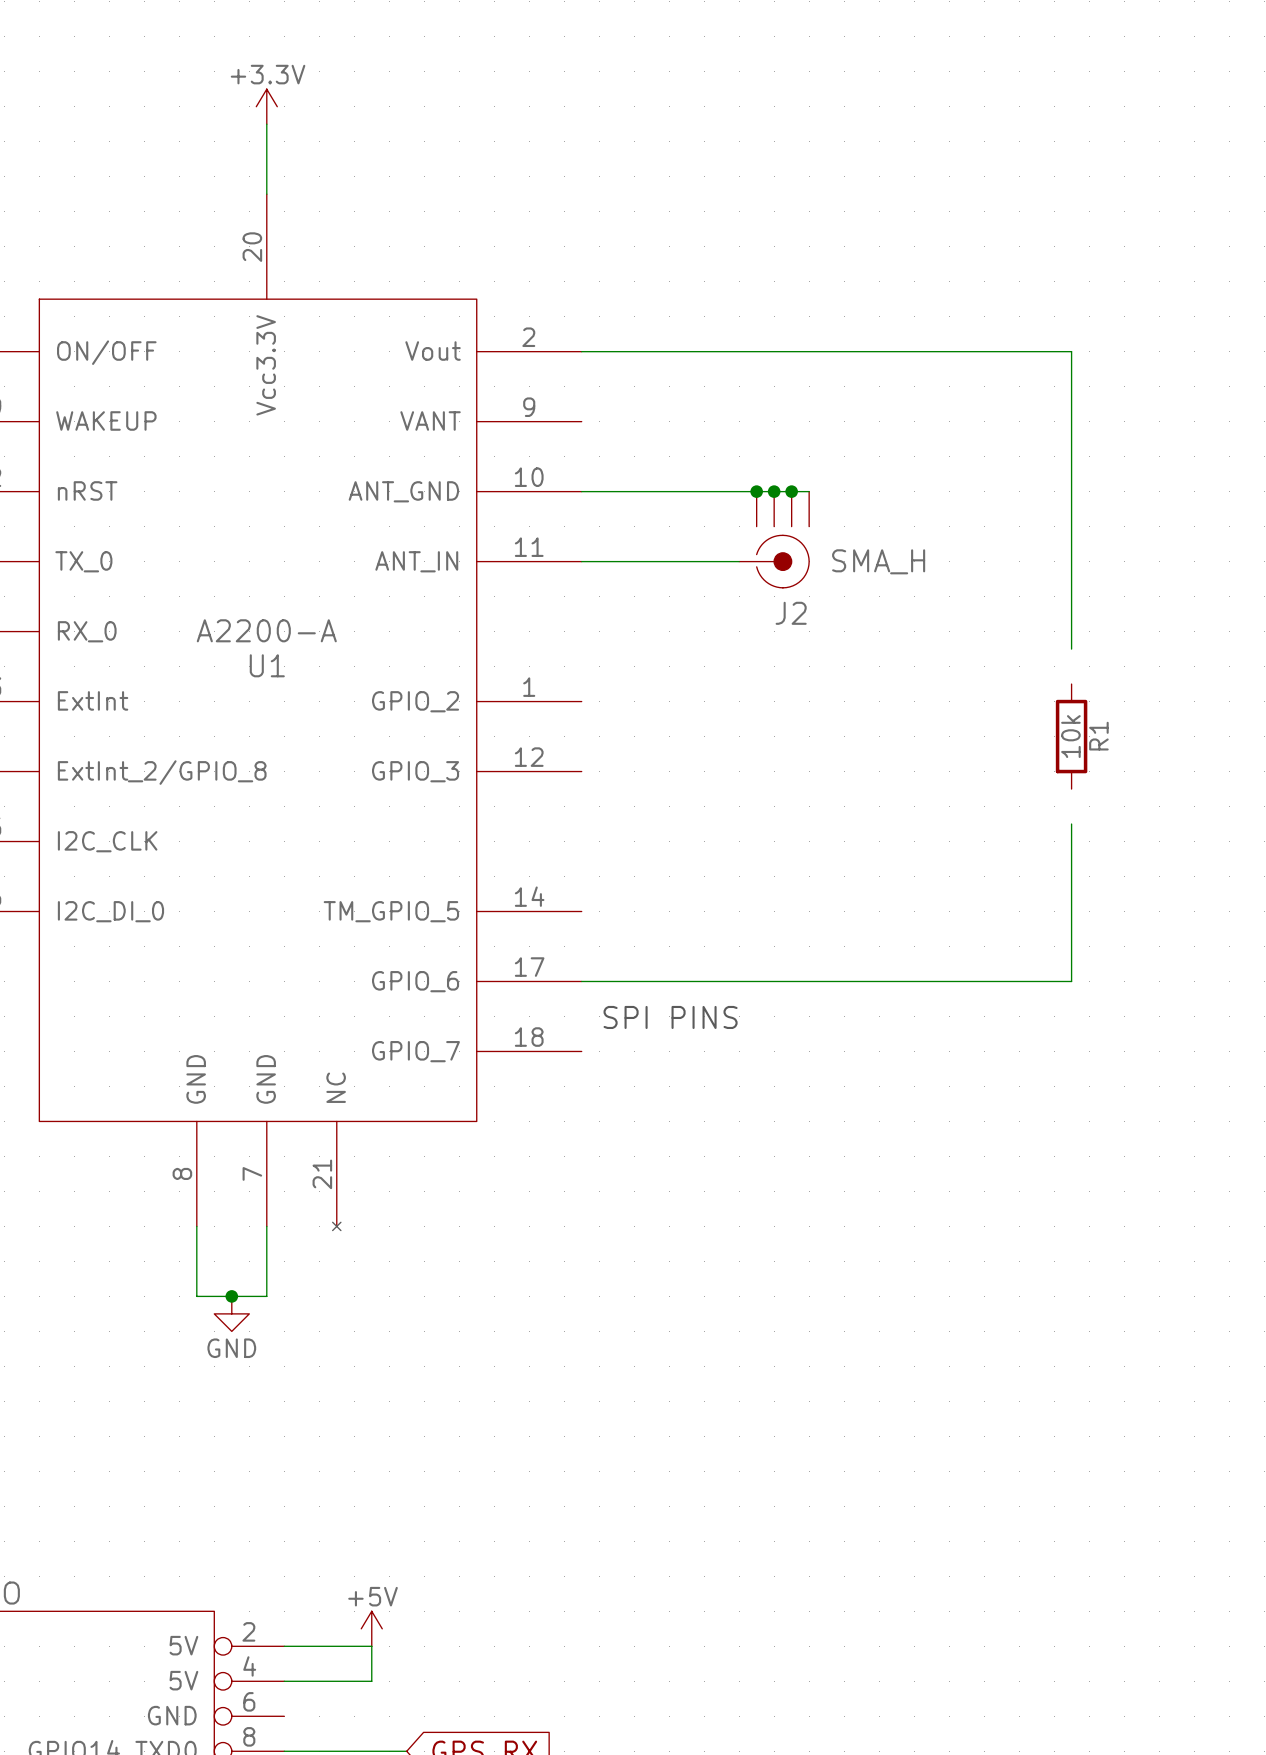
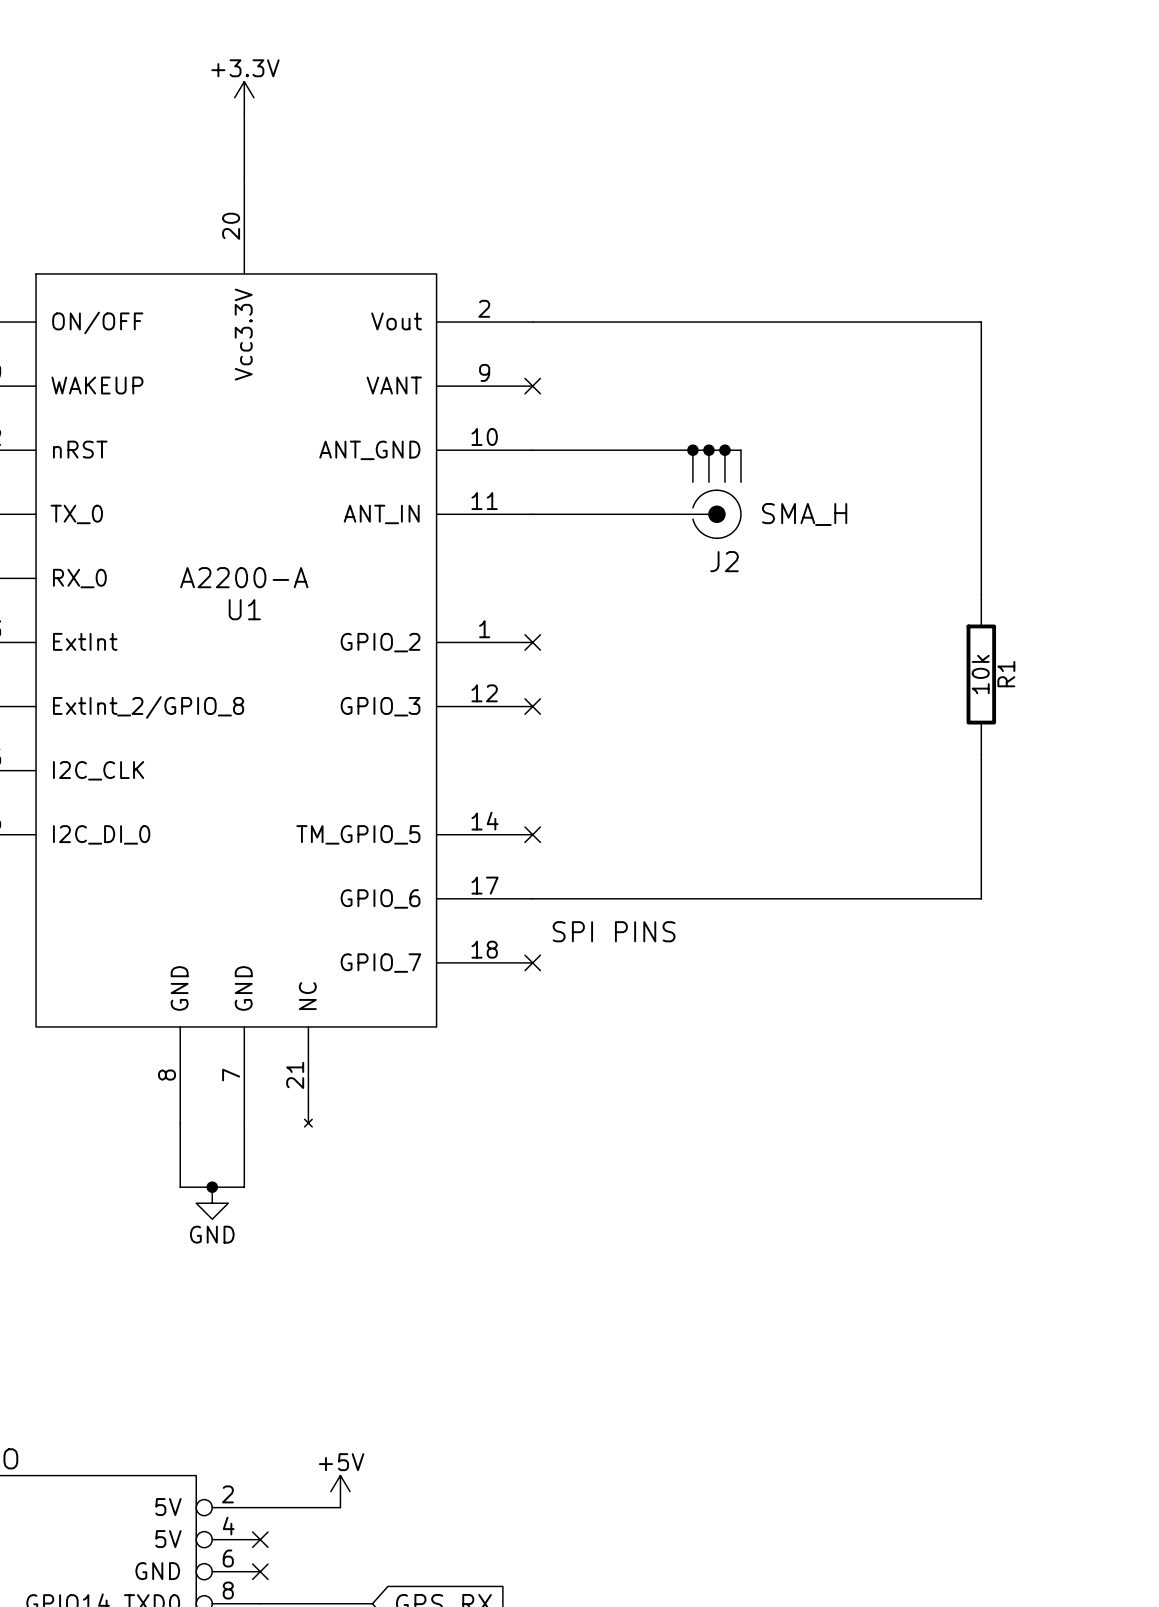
no-connect mark: none -> (532, 386)
R1 symbol: [1055, 684, 1088, 790] -> [966, 594, 997, 755]
no-connect mark: none -> (532, 642)
no-connect mark: none -> (532, 706)
no-connect mark: none -> (532, 834)
no-connect mark: none -> (532, 962)
wire: (371, 1646) (371, 1681) (284, 1681) -> none
no-connect mark: none -> (260, 1539)
no-connect mark: none -> (260, 1571)

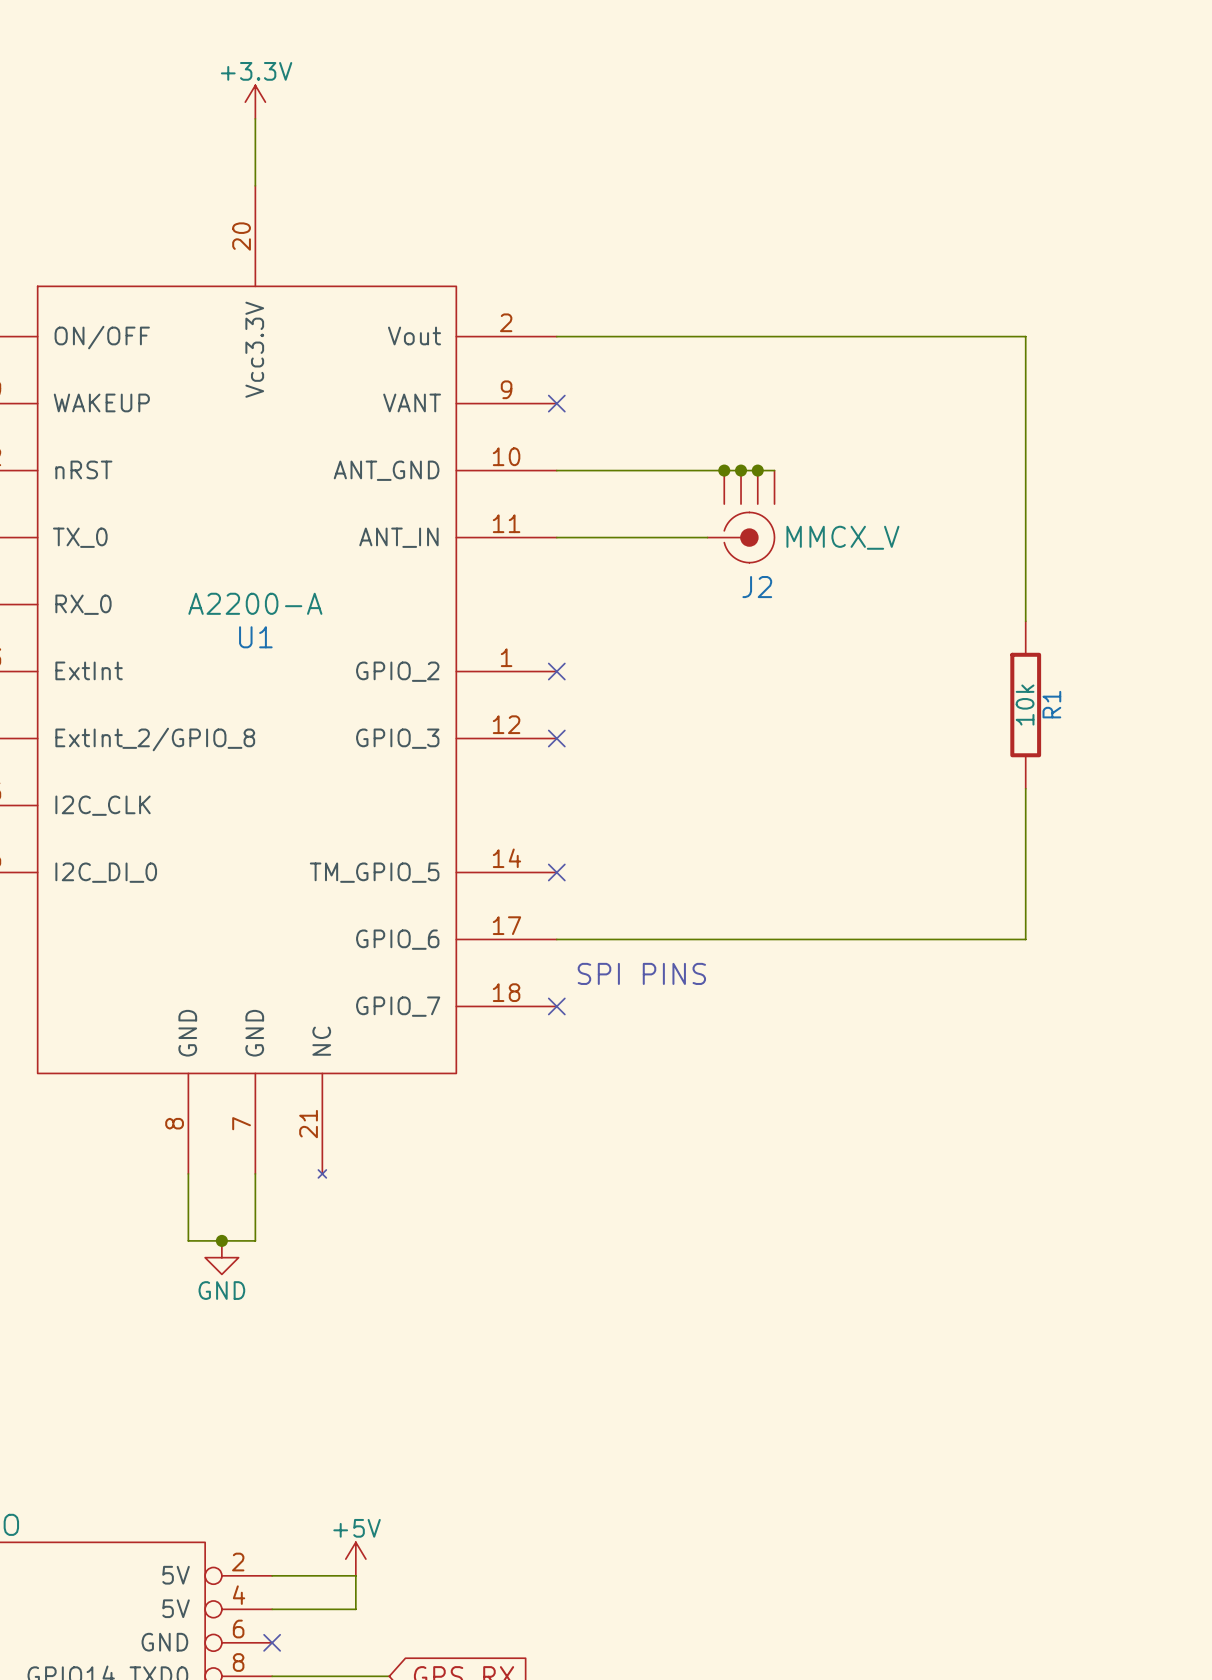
J2 text: SMA_H (804, 514) -> MMCX_V (842, 537)
wire: none -> (355, 1575) (355, 1609) (272, 1609)
no-connect mark: (260, 1539) -> none

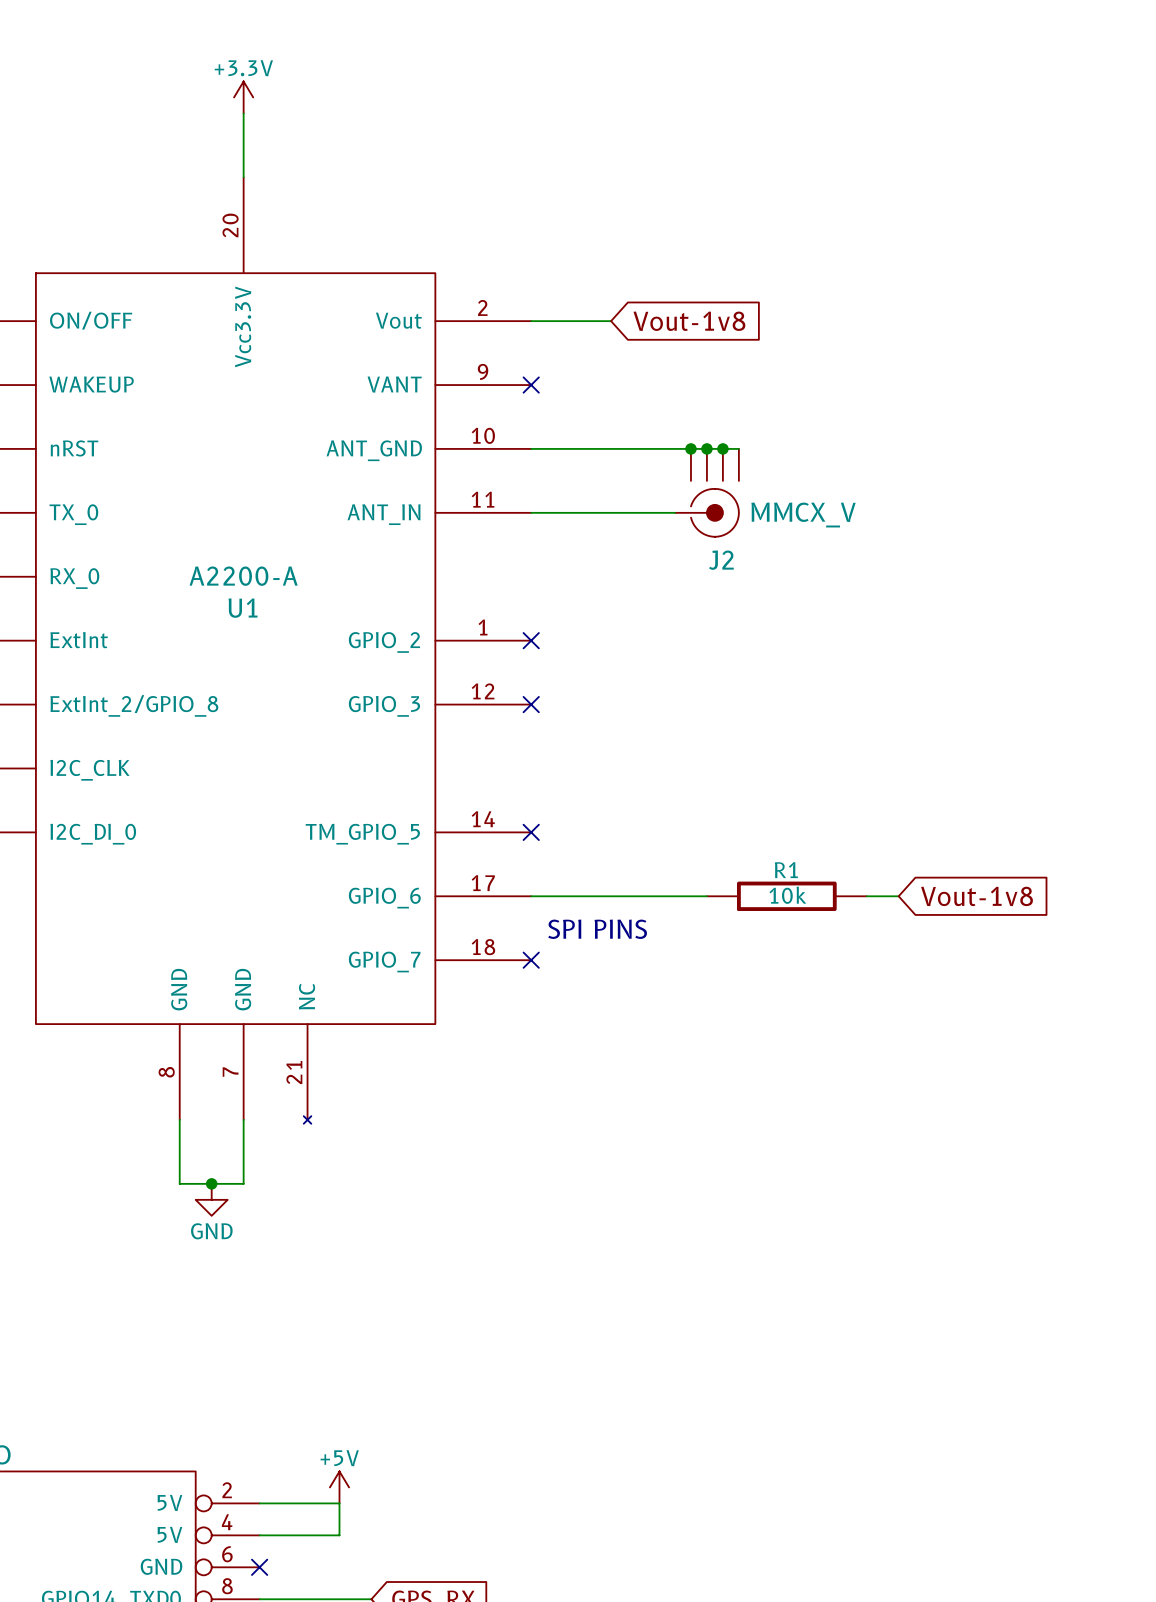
wire: (640, 336) (1025, 336) (1025, 621) -> none
global label: none -> Vout-1v8 (689, 321)
R1 name position: R1 (1051, 704) -> R1 (786, 870)
R1 rotation: 0° (1025, 705) -> 90° clockwise (786, 896)
R1 position: (1025, 705) -> (786, 896)
wire: (1025, 788) (1025, 939) (941, 939) -> none
wire: (741, 939) (908, 939) -> none
global label: none -> Vout-1v8 (977, 896)

